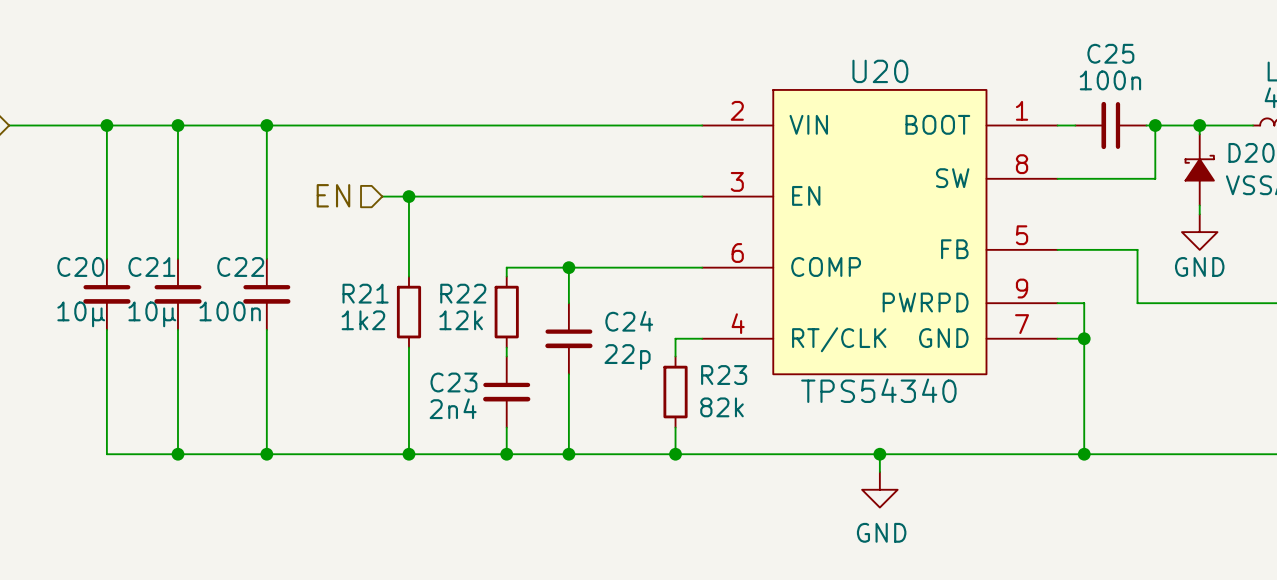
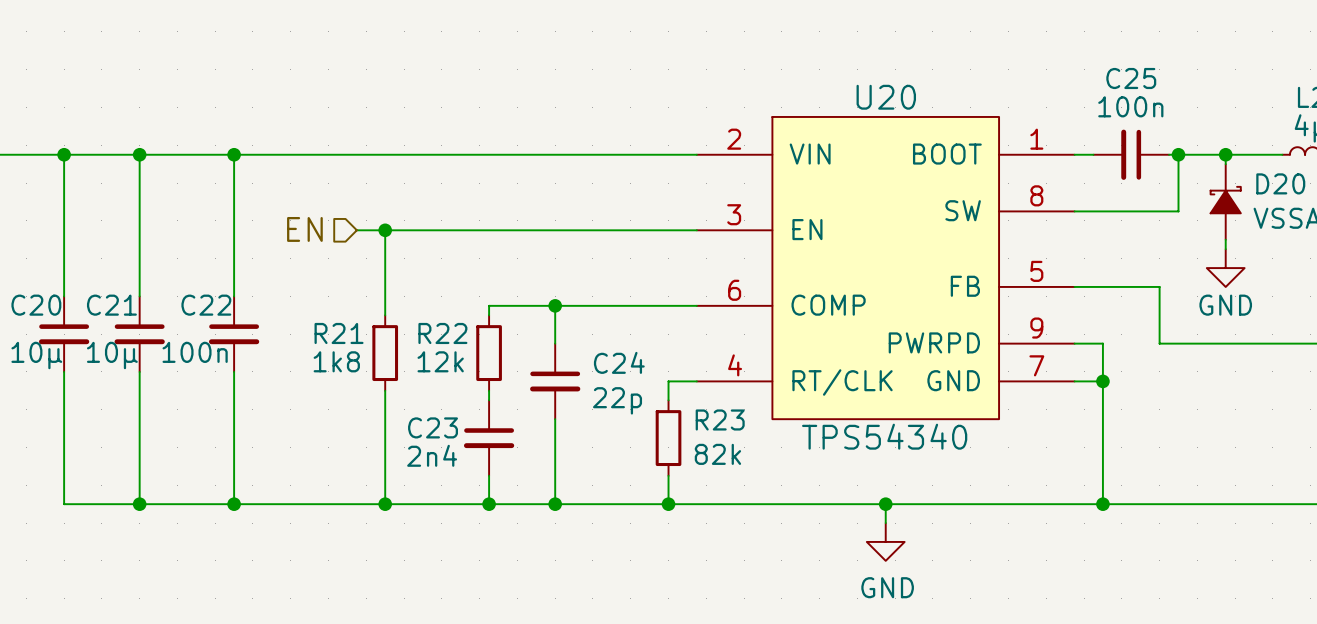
R21 value: 1k2 (363, 320) -> 1k8 (336, 361)

